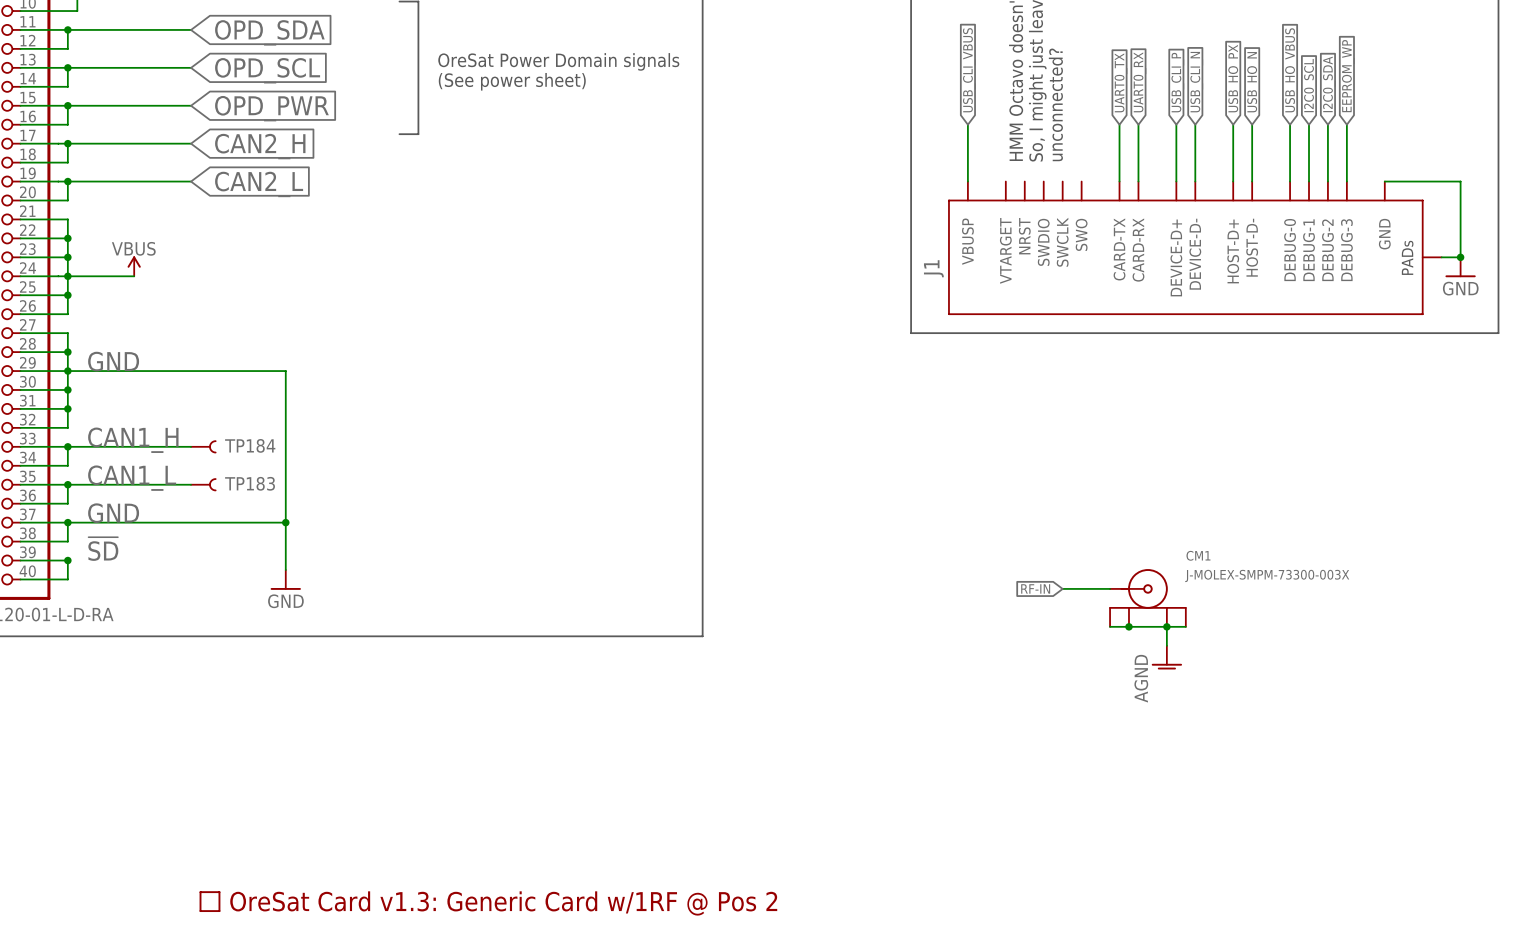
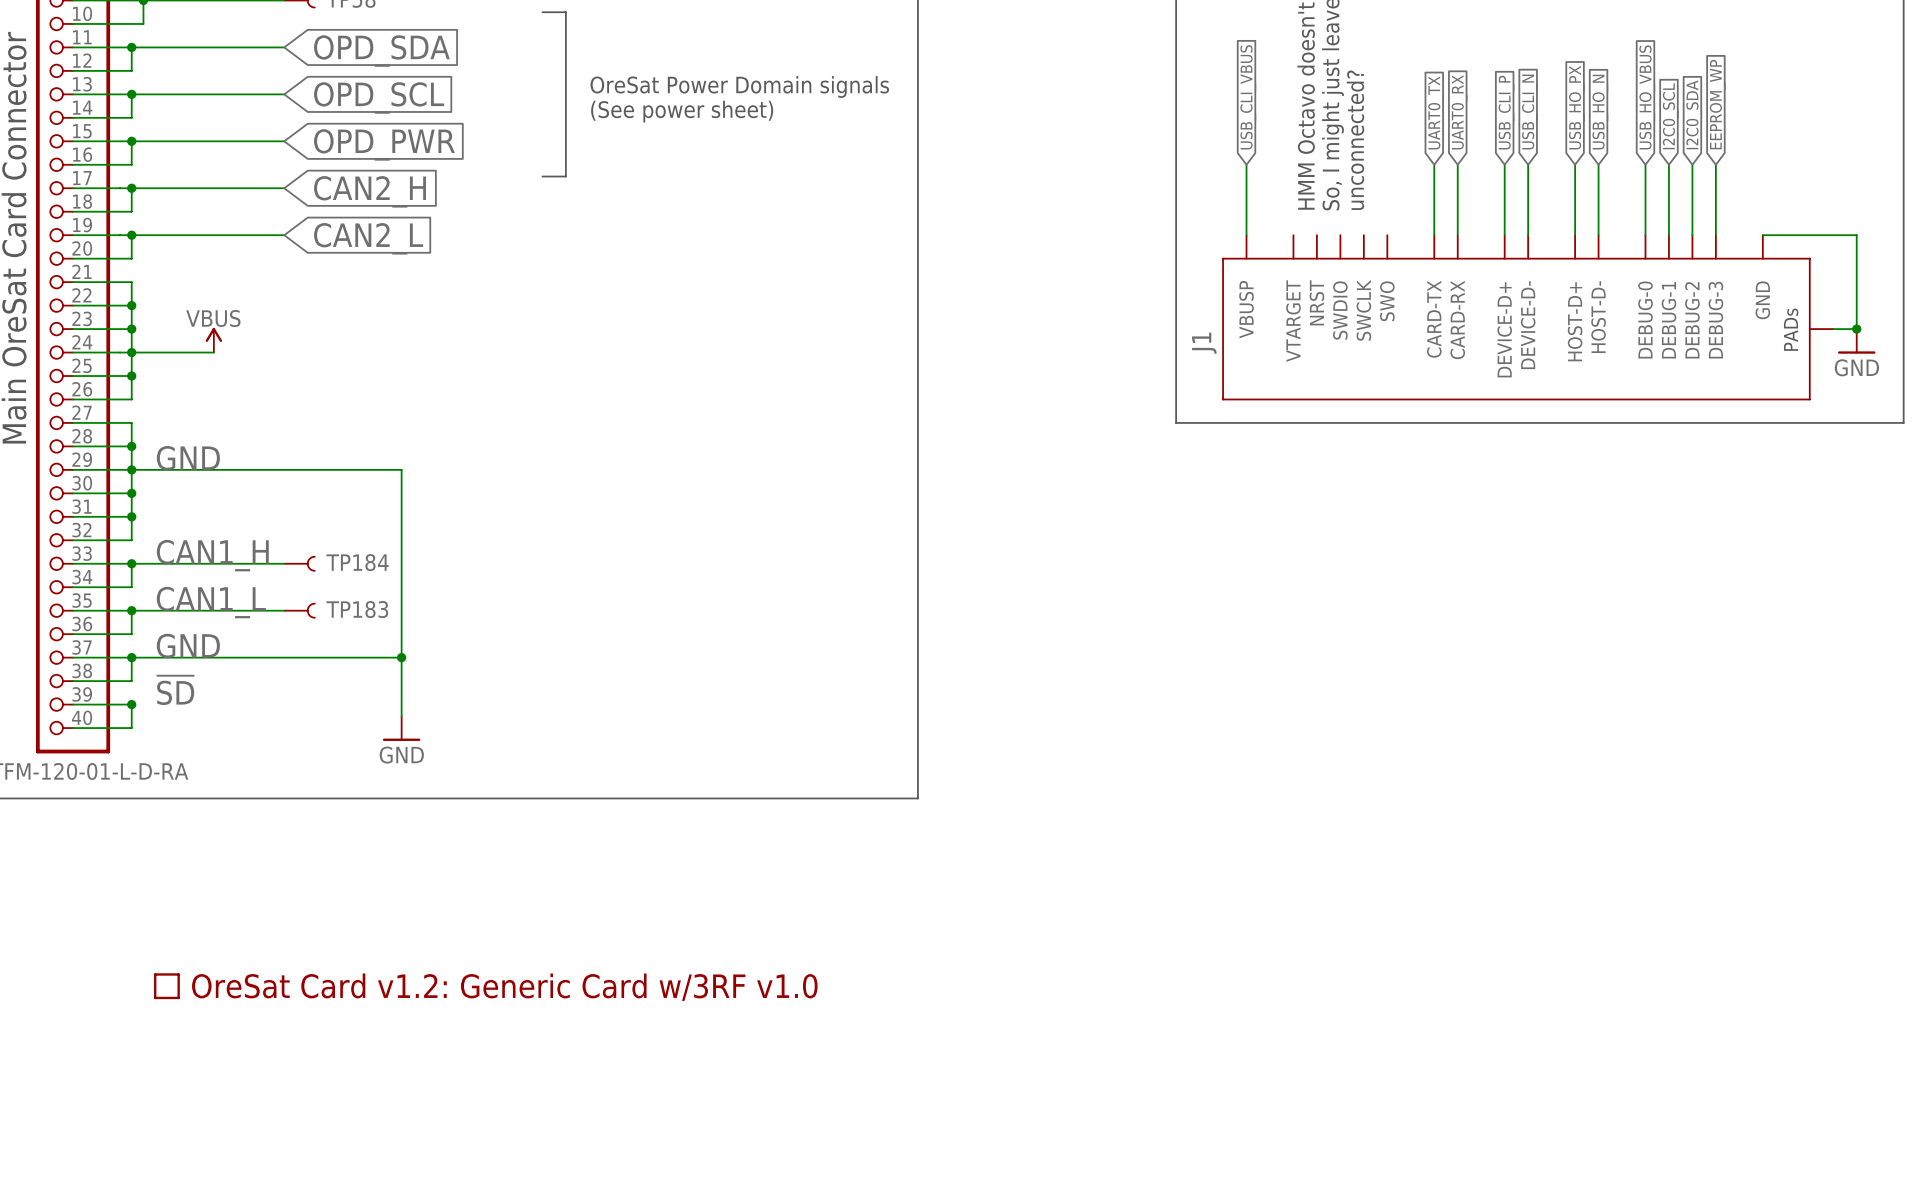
global label: RF-IN (1035, 588) -> none
wire: (1062, 588) (1110, 588) -> none
CM1: J-MOLEX-SMPM-73300-003X (1147, 597) -> none
wire: (1110, 626) (1185, 626) -> none
junction: (1128, 626) -> none
wire: (1166, 626) (1166, 645) -> none
junction: (1166, 626) -> none
power symbol: AGND (1166, 657) -> none
part: none -> (166, 986)
part: (209, 901) -> none

